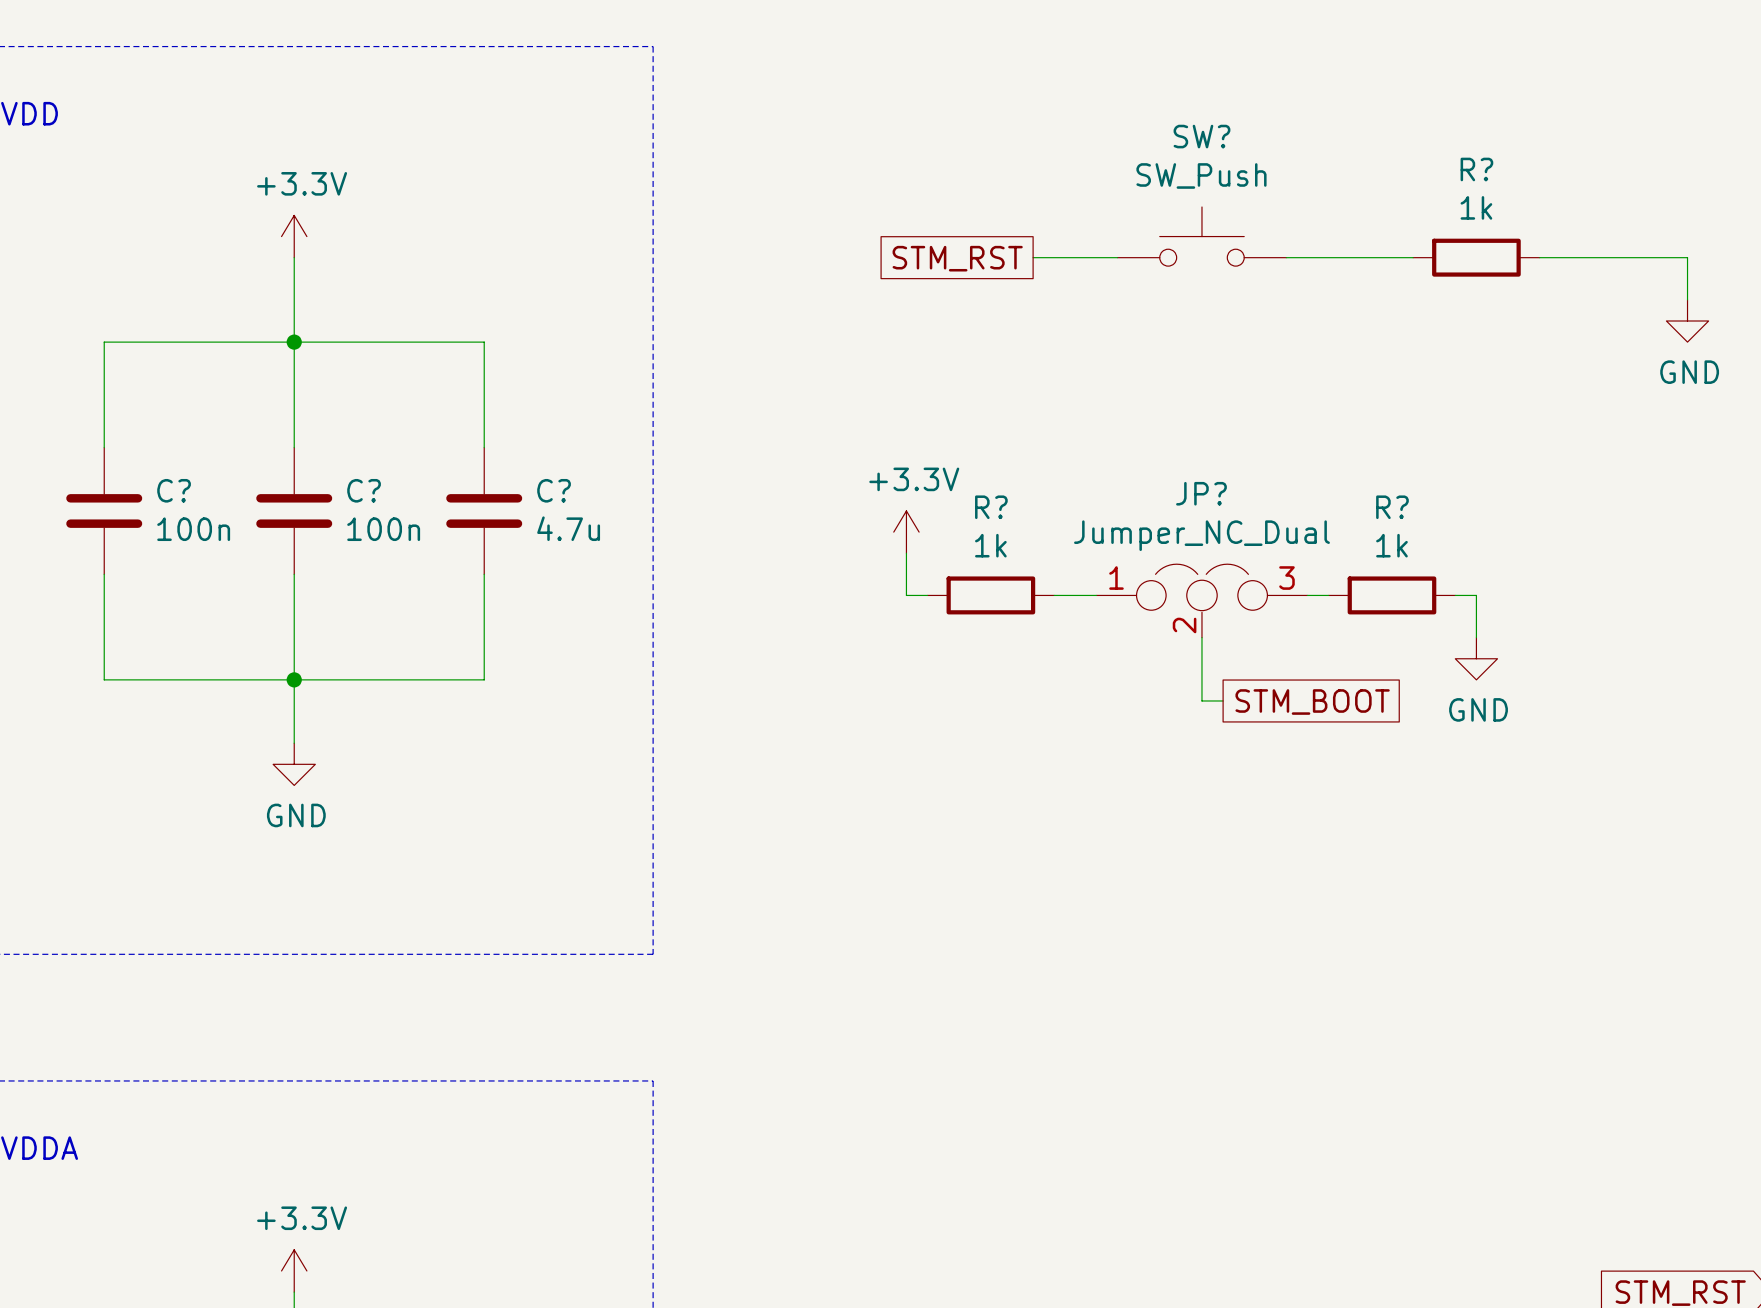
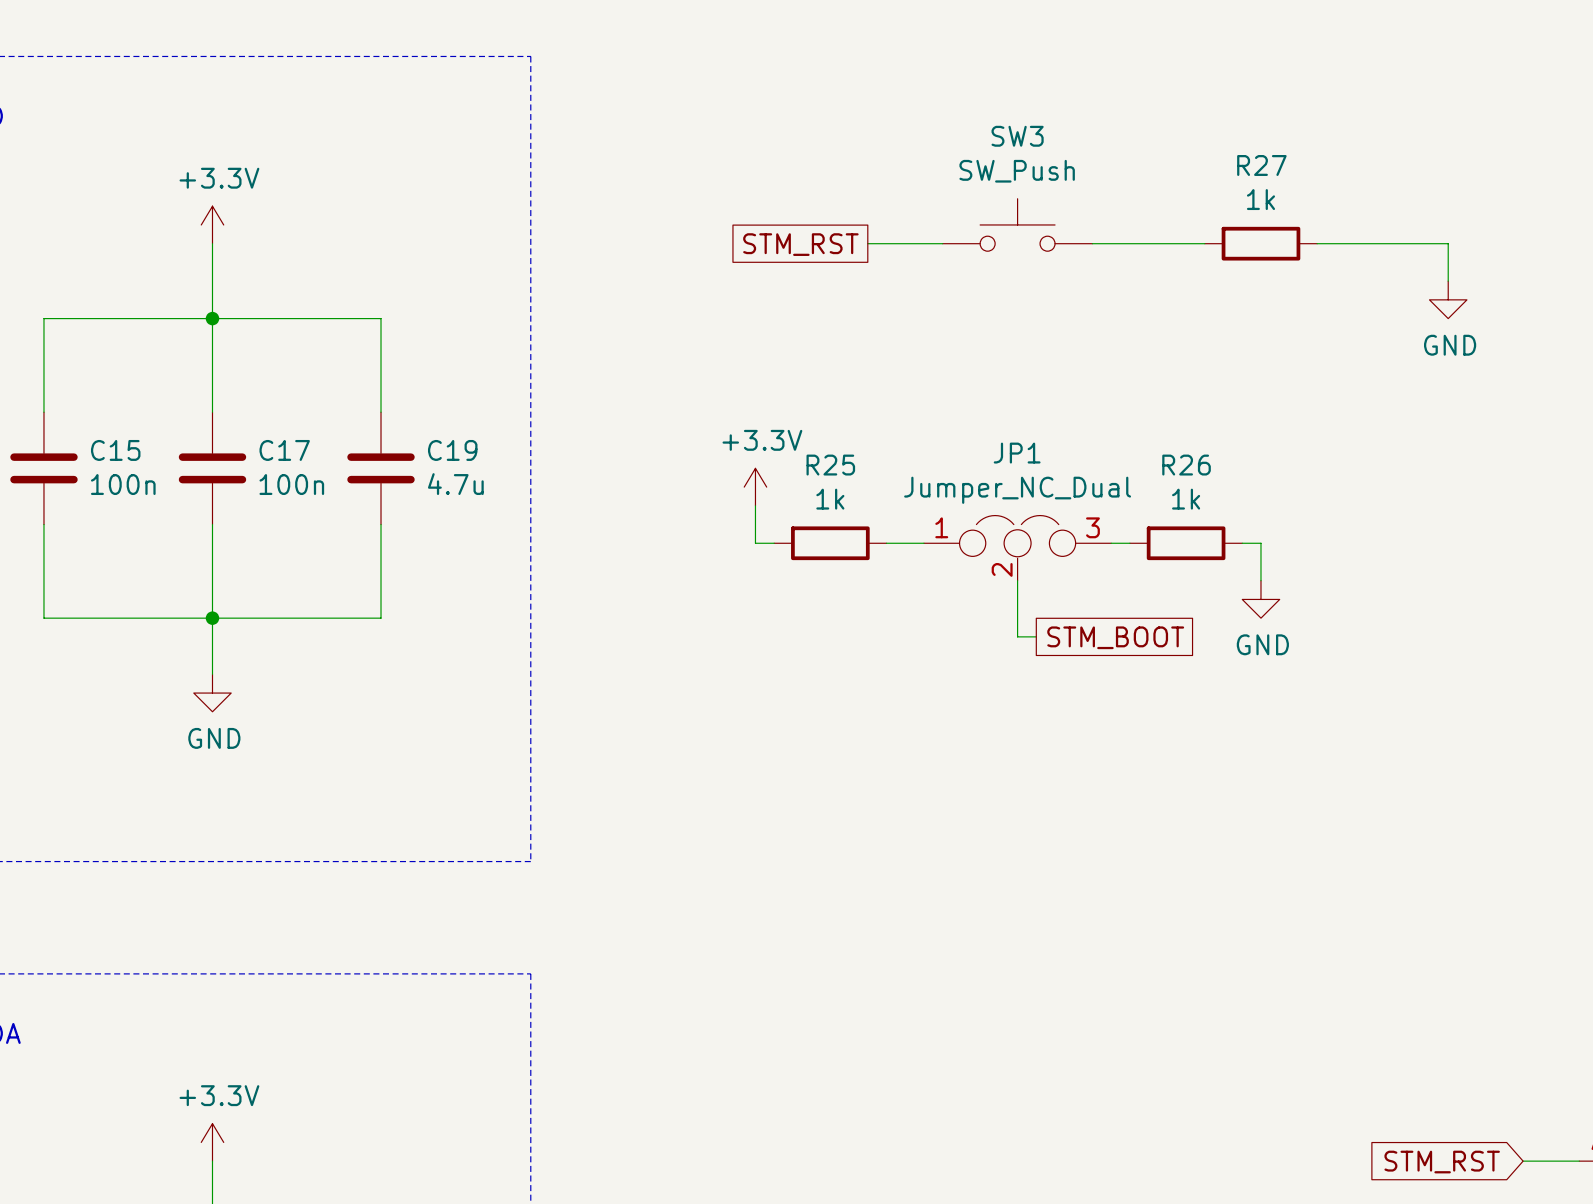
SW? name: SW? (1201, 136) -> SW3 (1017, 136)
R? name: R? (1476, 169) -> R27 (1261, 165)
C? name: C? (174, 490) -> C15 (115, 450)
C? name: C? (364, 490) -> C17 (284, 450)
C? name: C? (554, 490) -> C19 (452, 450)
JP? name: JP? (1201, 493) -> JP1 (1017, 453)
R? name: R? (991, 507) -> R25 (830, 465)
R? name: R? (1392, 507) -> R26 (1186, 465)

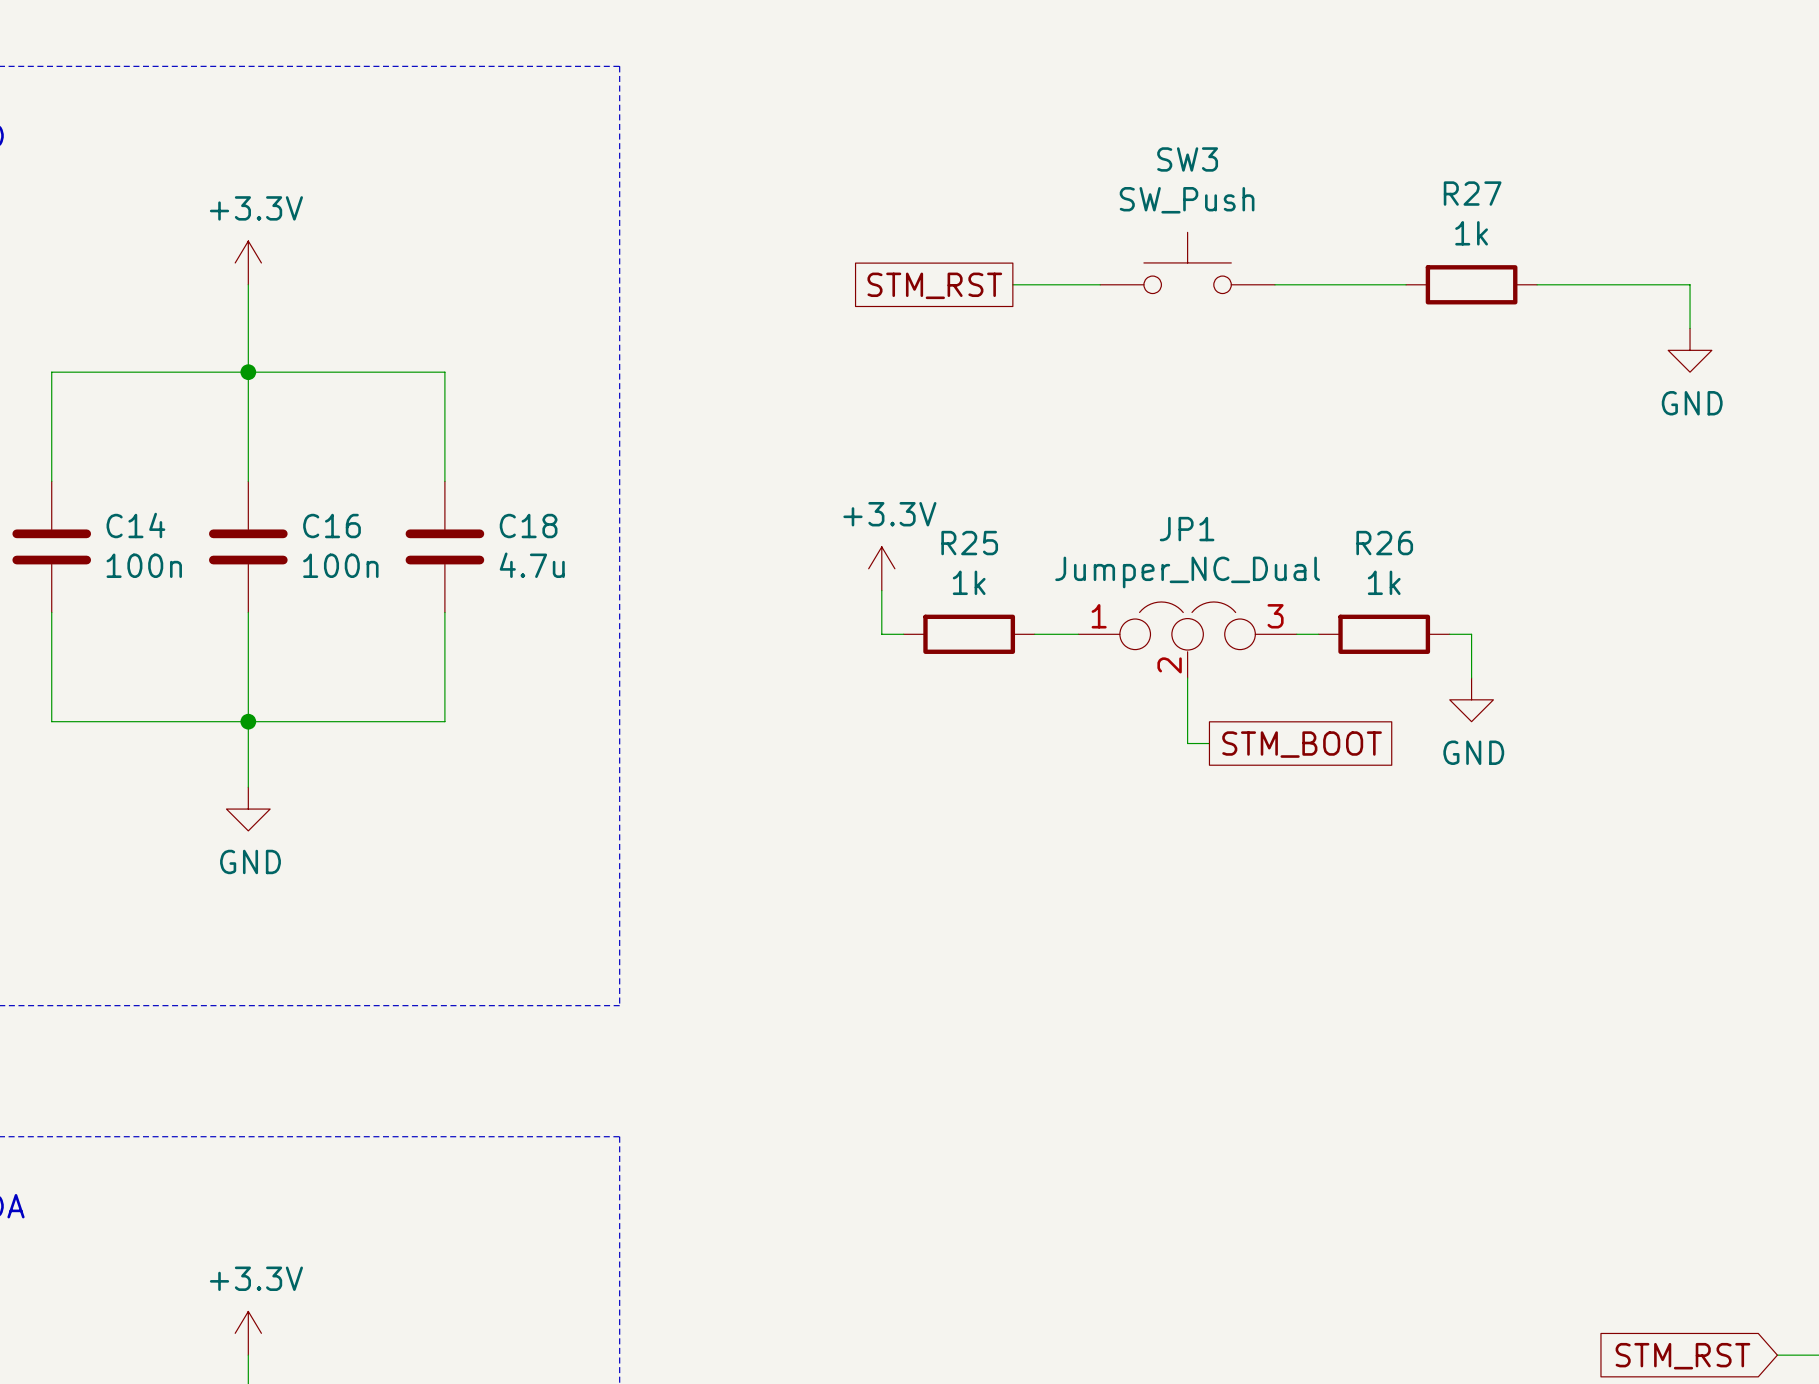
C15 name: C15 (115, 450) -> C14 (135, 525)
C17 name: C17 (284, 450) -> C16 (332, 526)
C19 name: C19 (452, 450) -> C18 (528, 526)

